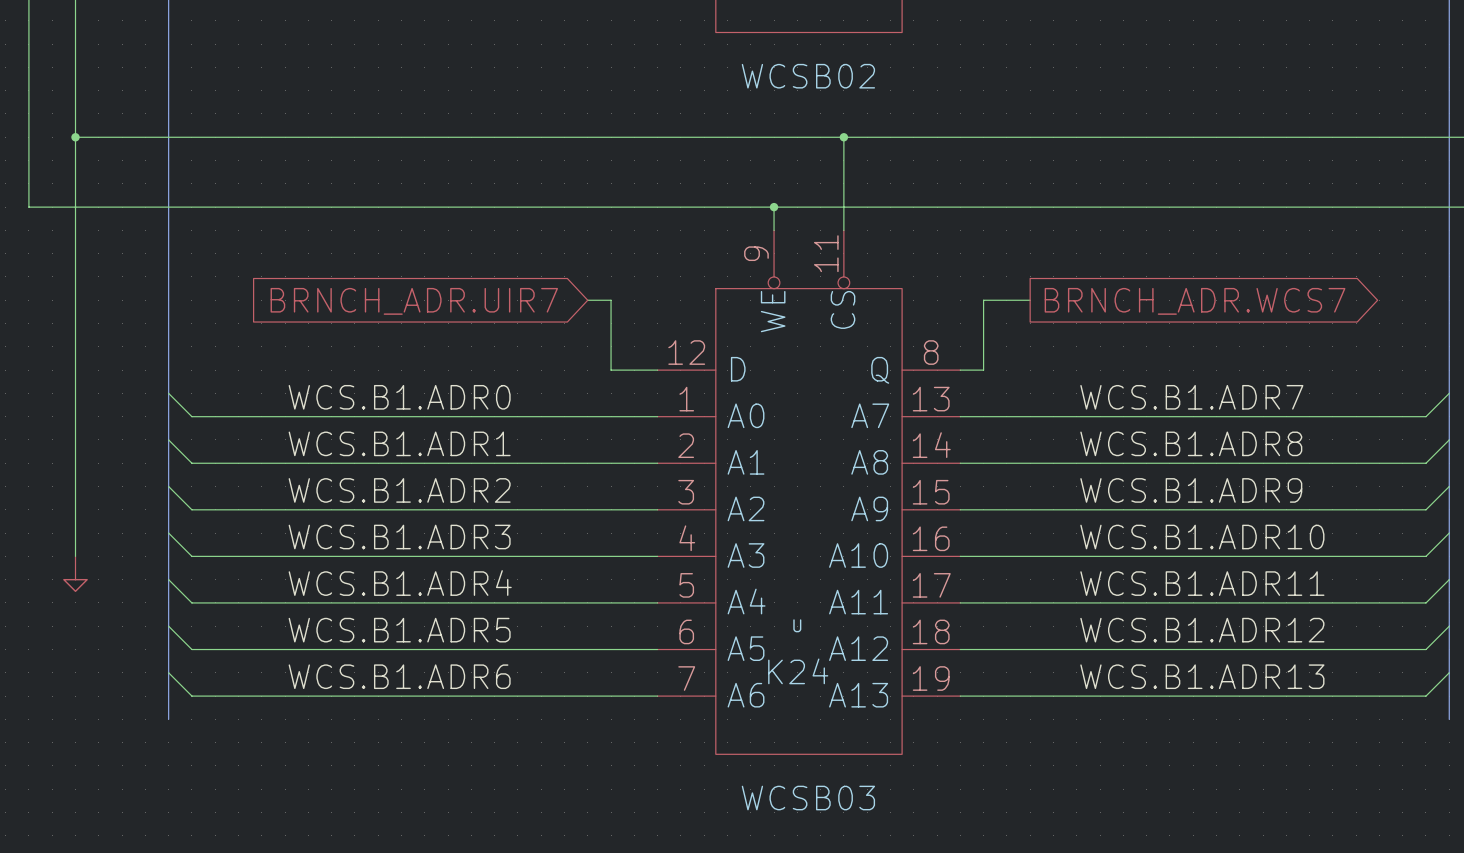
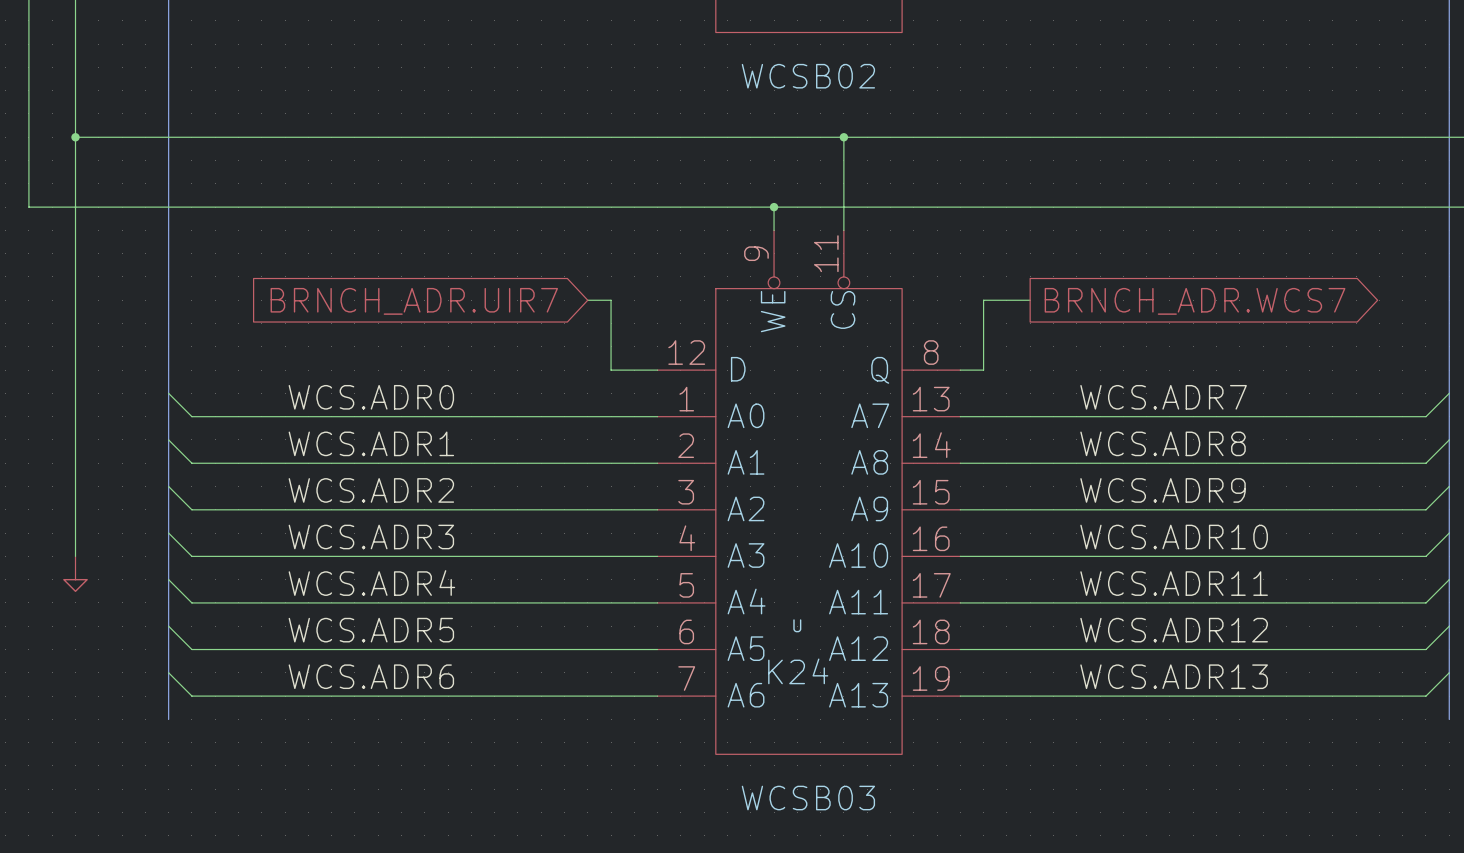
label: WCS.B1.ADR0 (399, 397) -> WCS.ADR0 (371, 397)
label: WCS.B1.ADR7 (1191, 397) -> WCS.ADR7 (1163, 397)
label: WCS.B1.ADR1 (399, 443) -> WCS.ADR1 (371, 443)
label: WCS.B1.ADR8 (1191, 443) -> WCS.ADR8 (1163, 443)
label: WCS.B1.ADR2 (399, 490) -> WCS.ADR2 (371, 490)
label: WCS.B1.ADR9 (1191, 490) -> WCS.ADR9 (1163, 490)
label: WCS.B1.ADR3 (399, 537) -> WCS.ADR3 (371, 537)
label: WCS.B1.ADR10 (1202, 537) -> WCS.ADR10 (1174, 537)
label: WCS.B1.ADR4 (400, 583) -> WCS.ADR4 (371, 583)
label: WCS.B1.ADR11 (1202, 583) -> WCS.ADR11 (1174, 583)
label: WCS.B1.ADR5 (399, 630) -> WCS.ADR5 (371, 630)
label: WCS.B1.ADR12 (1202, 630) -> WCS.ADR12 (1174, 630)
label: WCS.B1.ADR6 (399, 676) -> WCS.ADR6 (371, 676)
label: WCS.B1.ADR13 (1202, 676) -> WCS.ADR13 (1174, 676)

